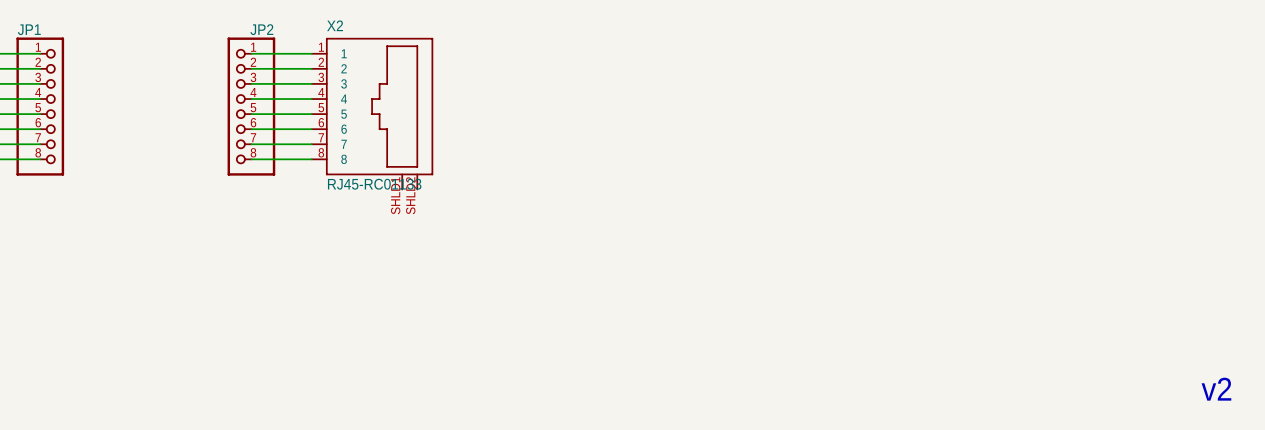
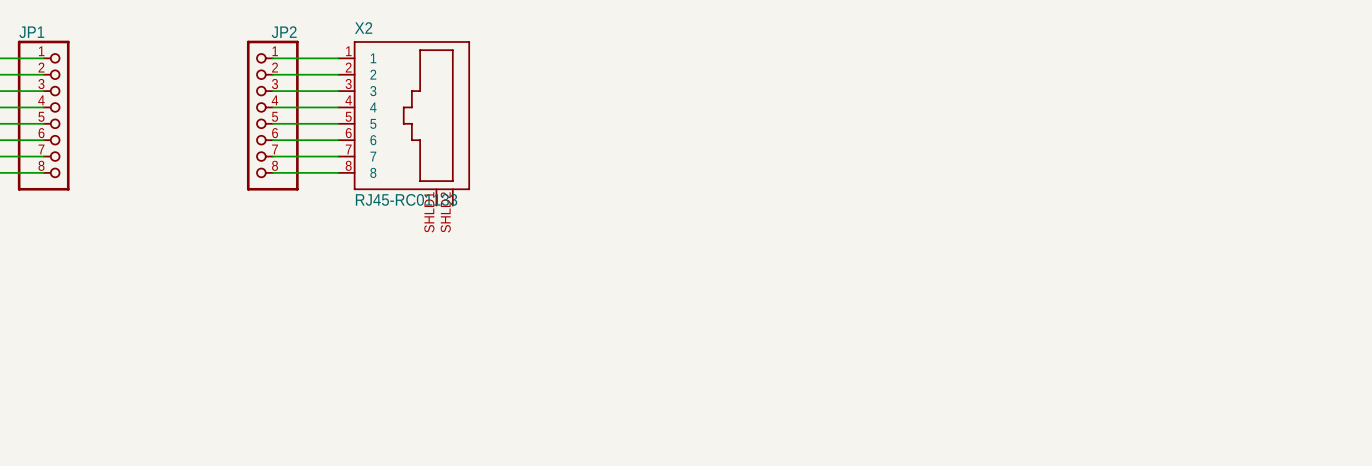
text: v2 (1216, 389) -> none

